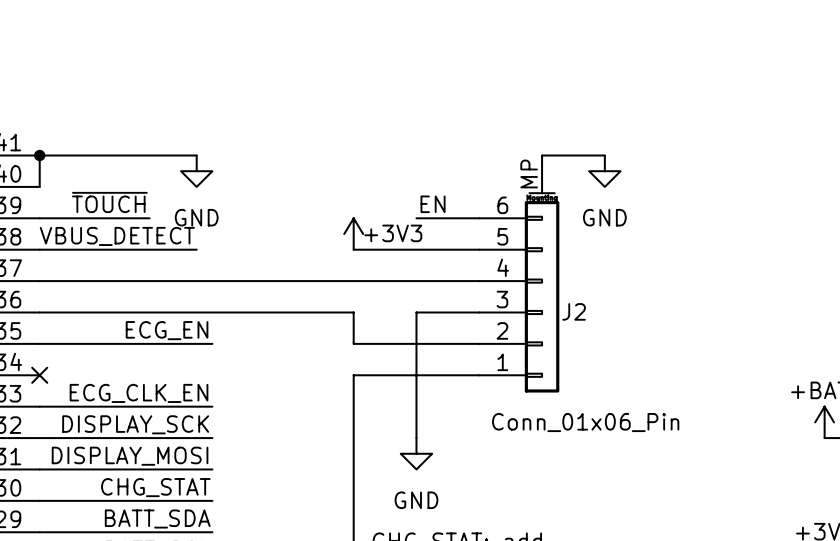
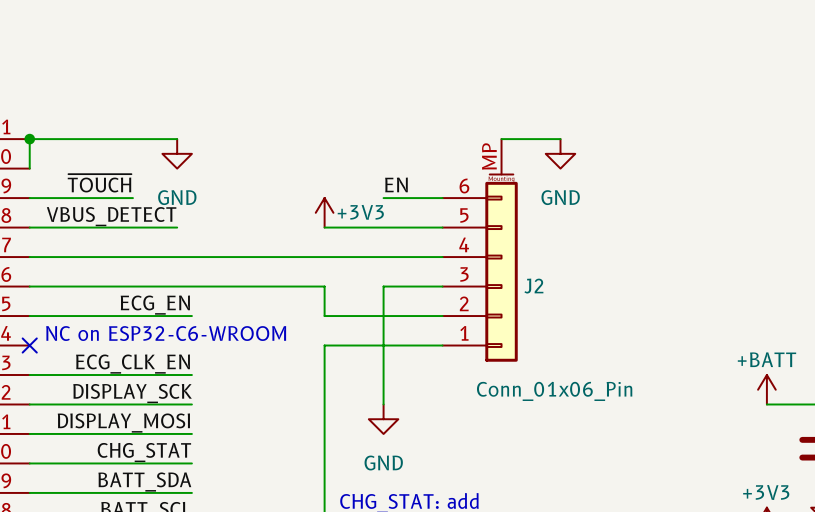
text: none -> NC on ESP32-C6-WROOM (166, 333)

